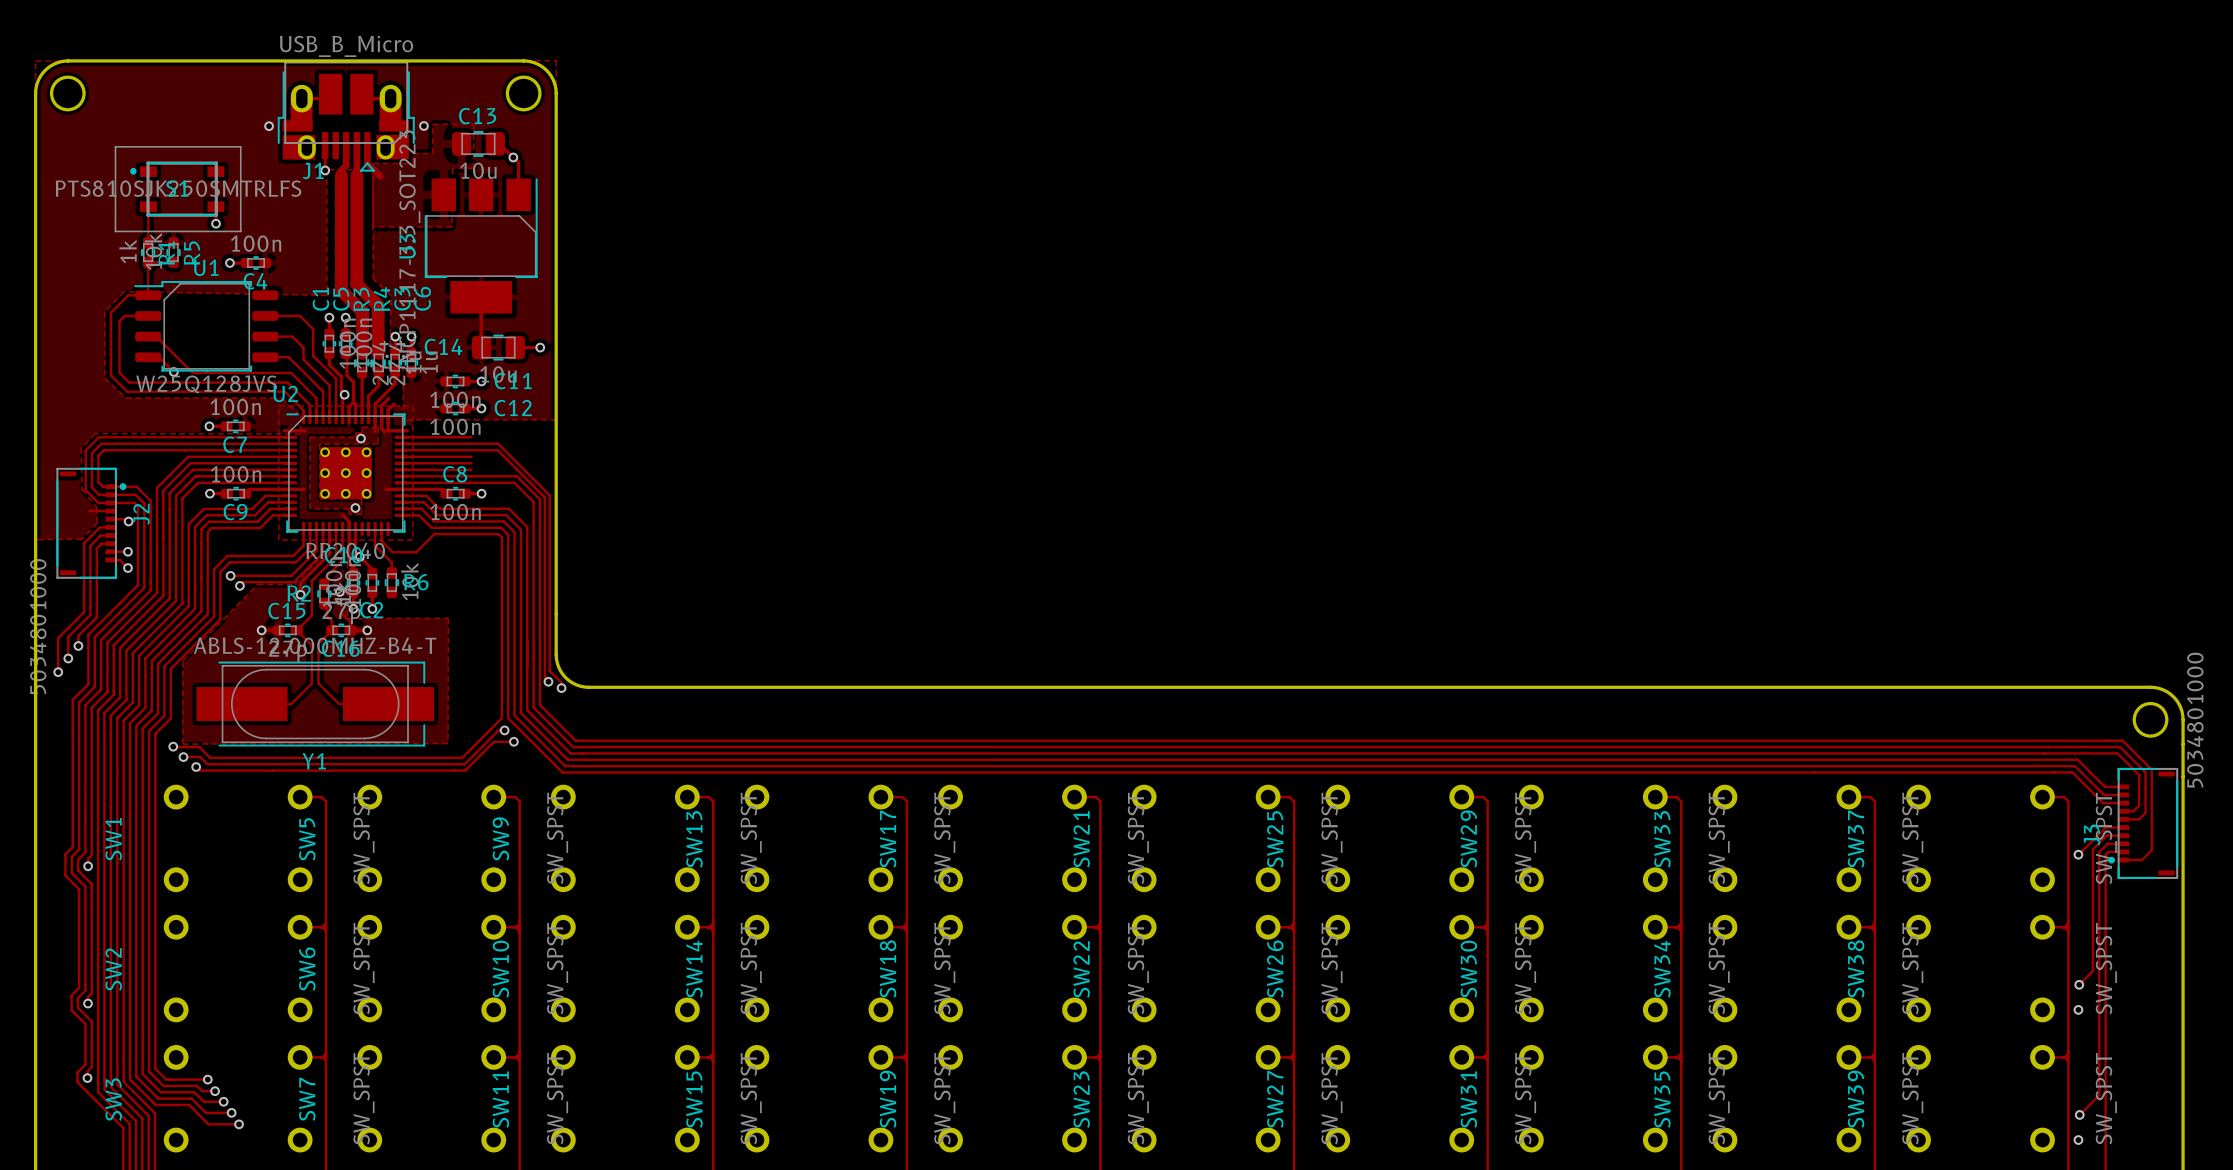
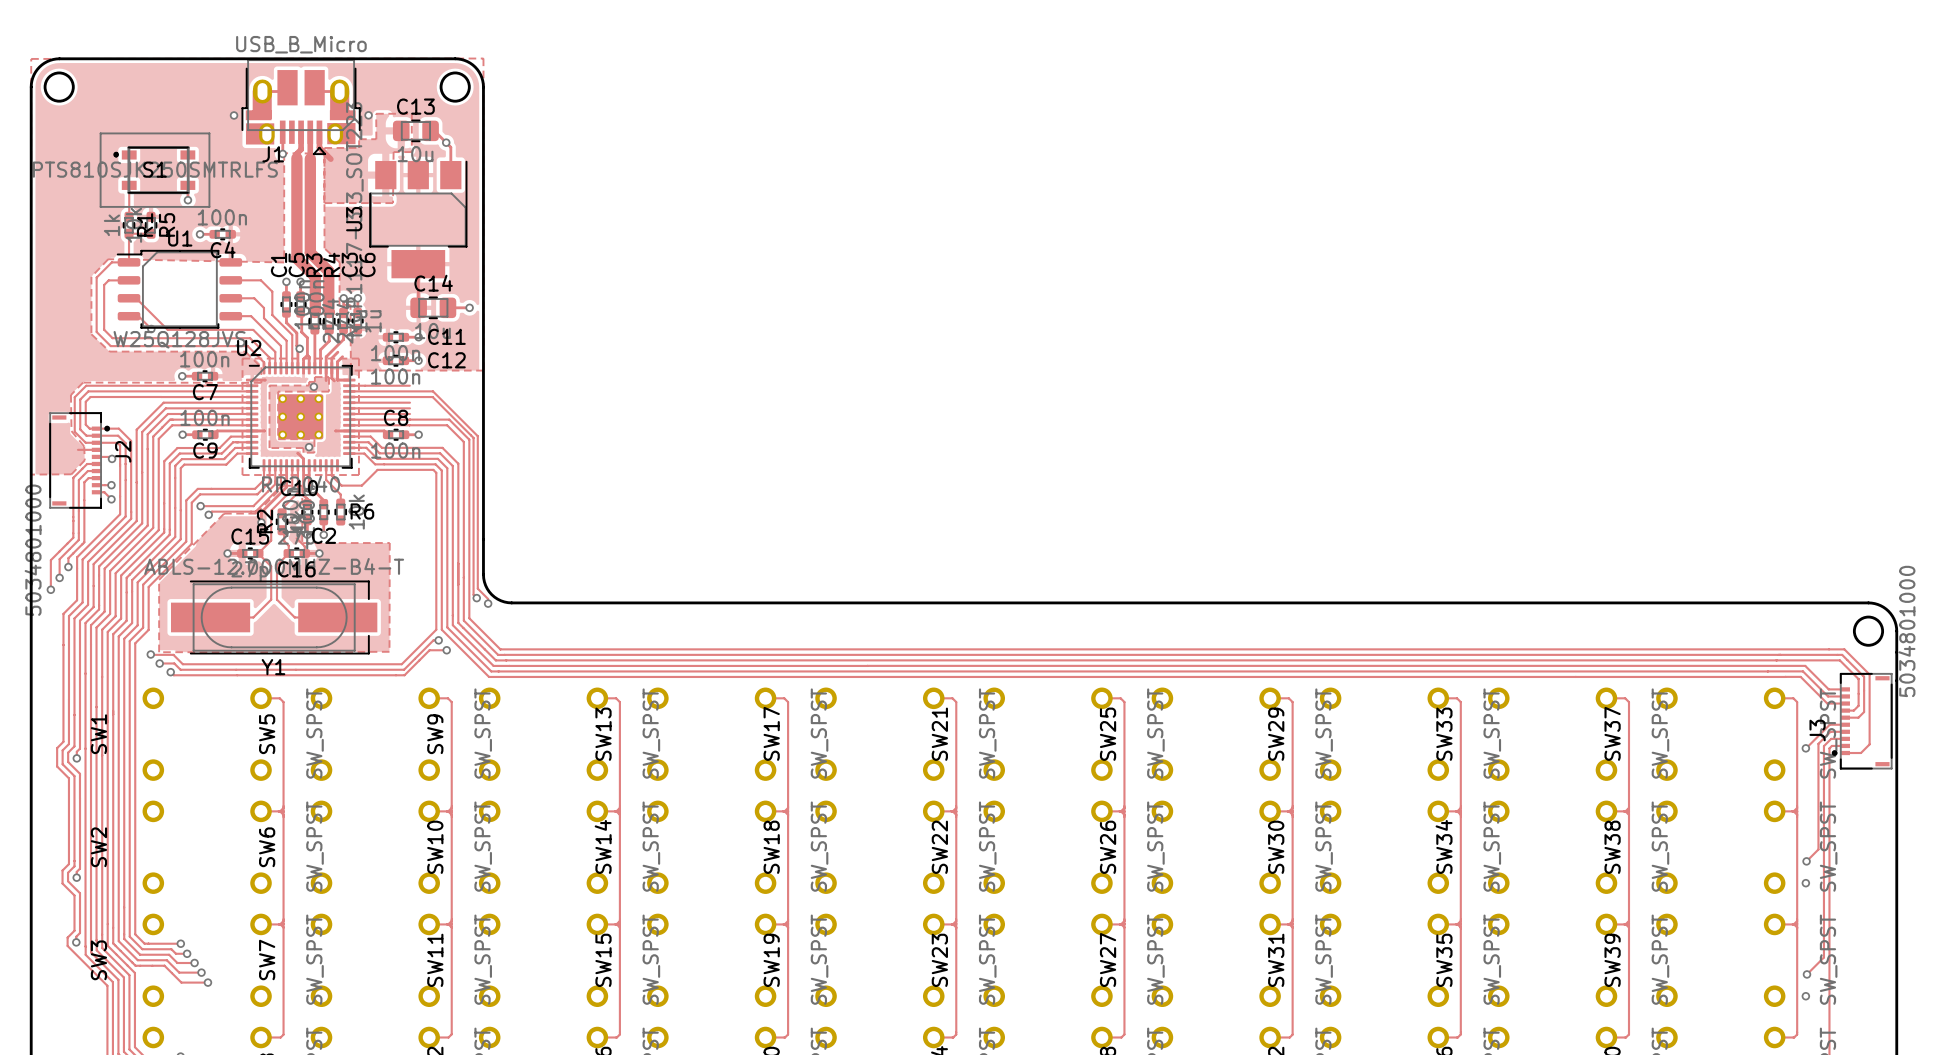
C14 name position: C14 (443, 346) -> C14 (433, 283)
R2 name rotation: 0° (299, 593) -> 90° counterclockwise (265, 521)

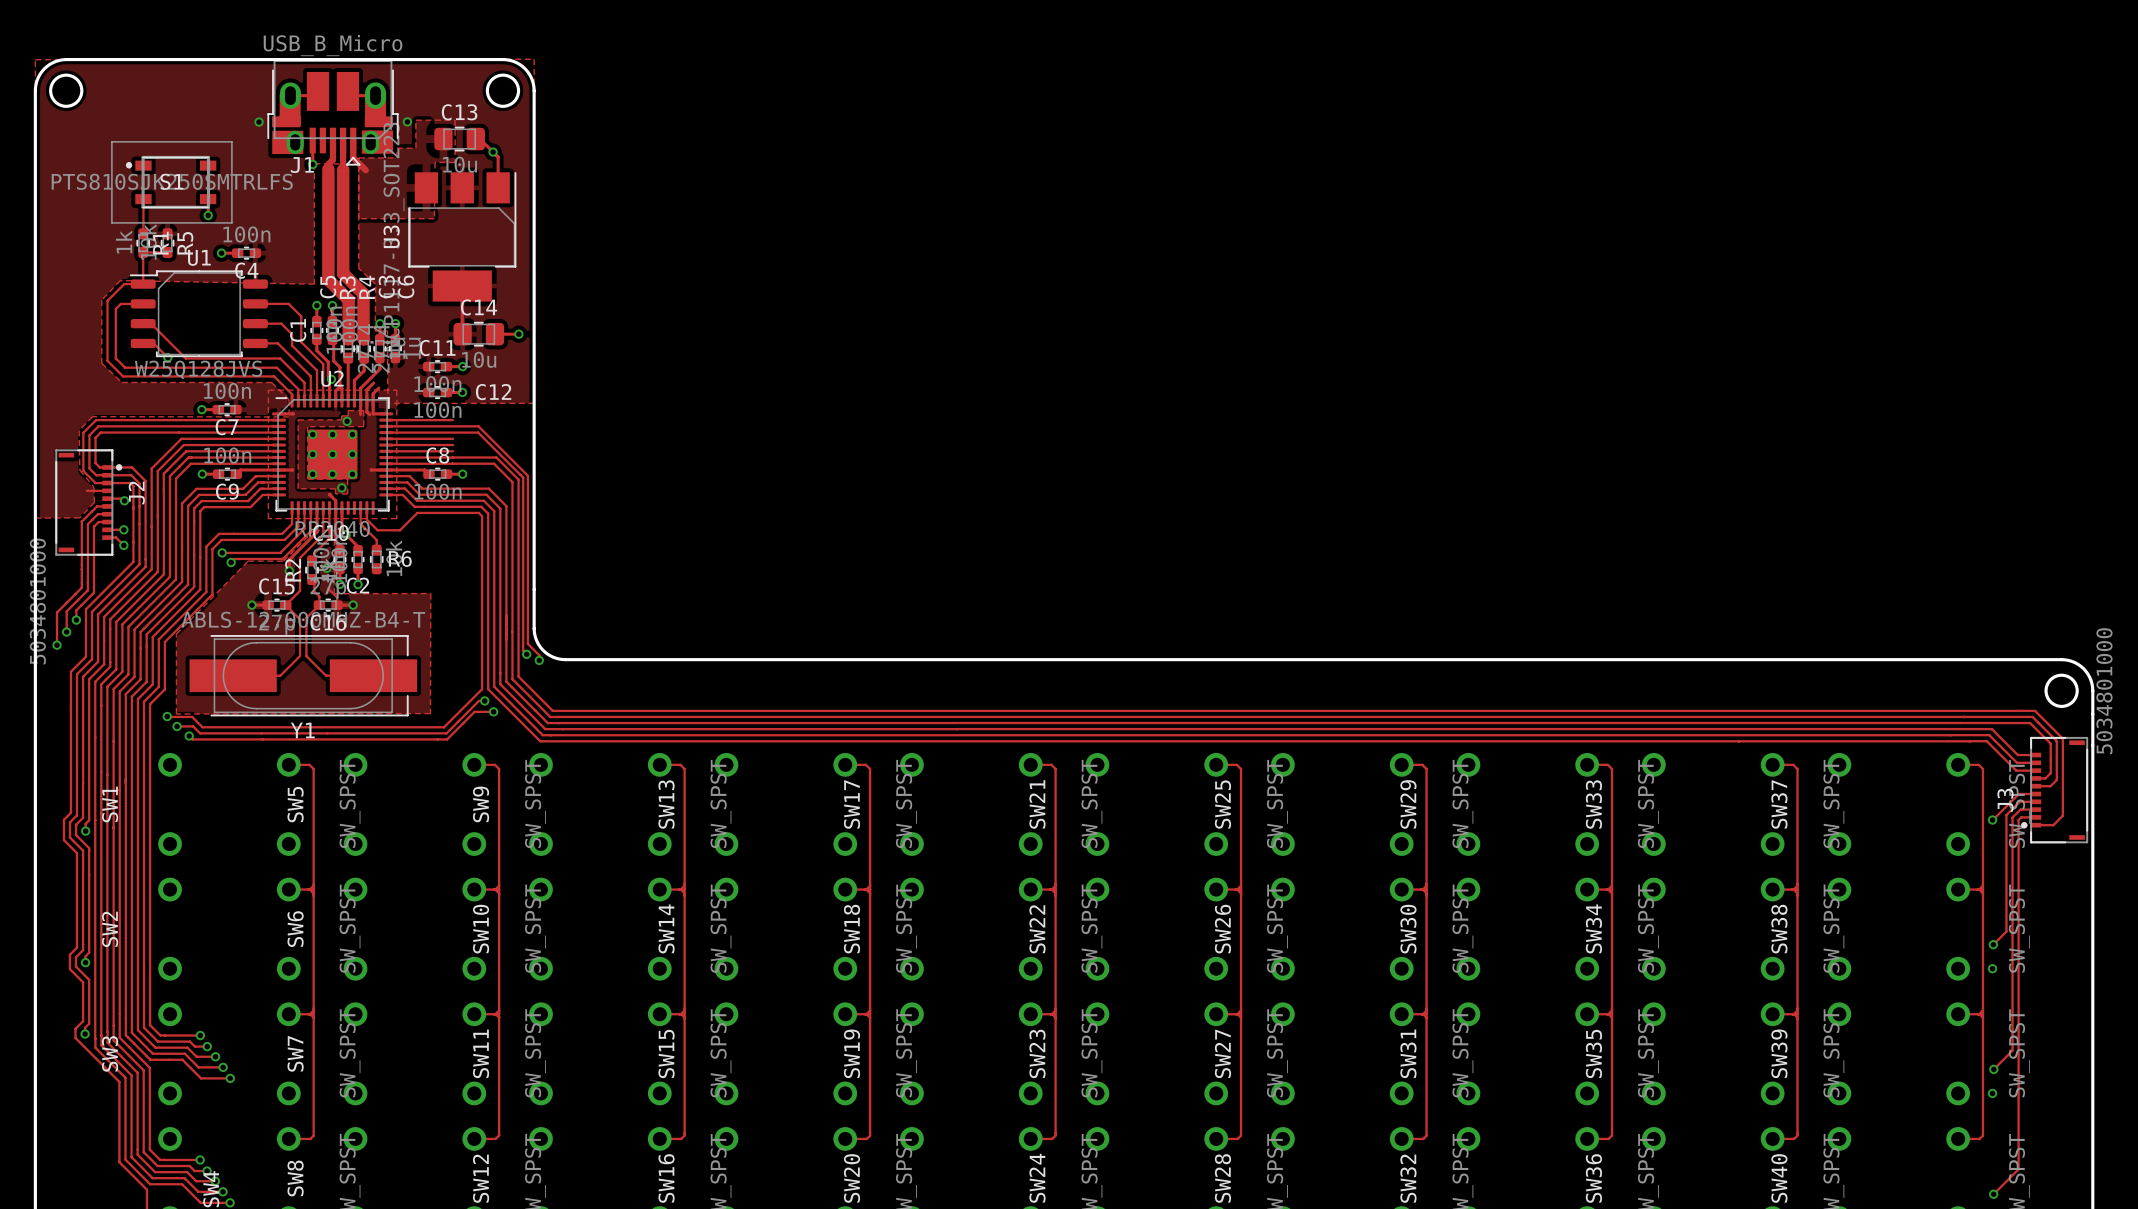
C1 name position: C1 (279, 265) -> C1 (298, 330)
C11 name position: C11 (446, 336) -> C11 (437, 348)
U2 name position: U2 (249, 347) -> U2 (332, 378)

